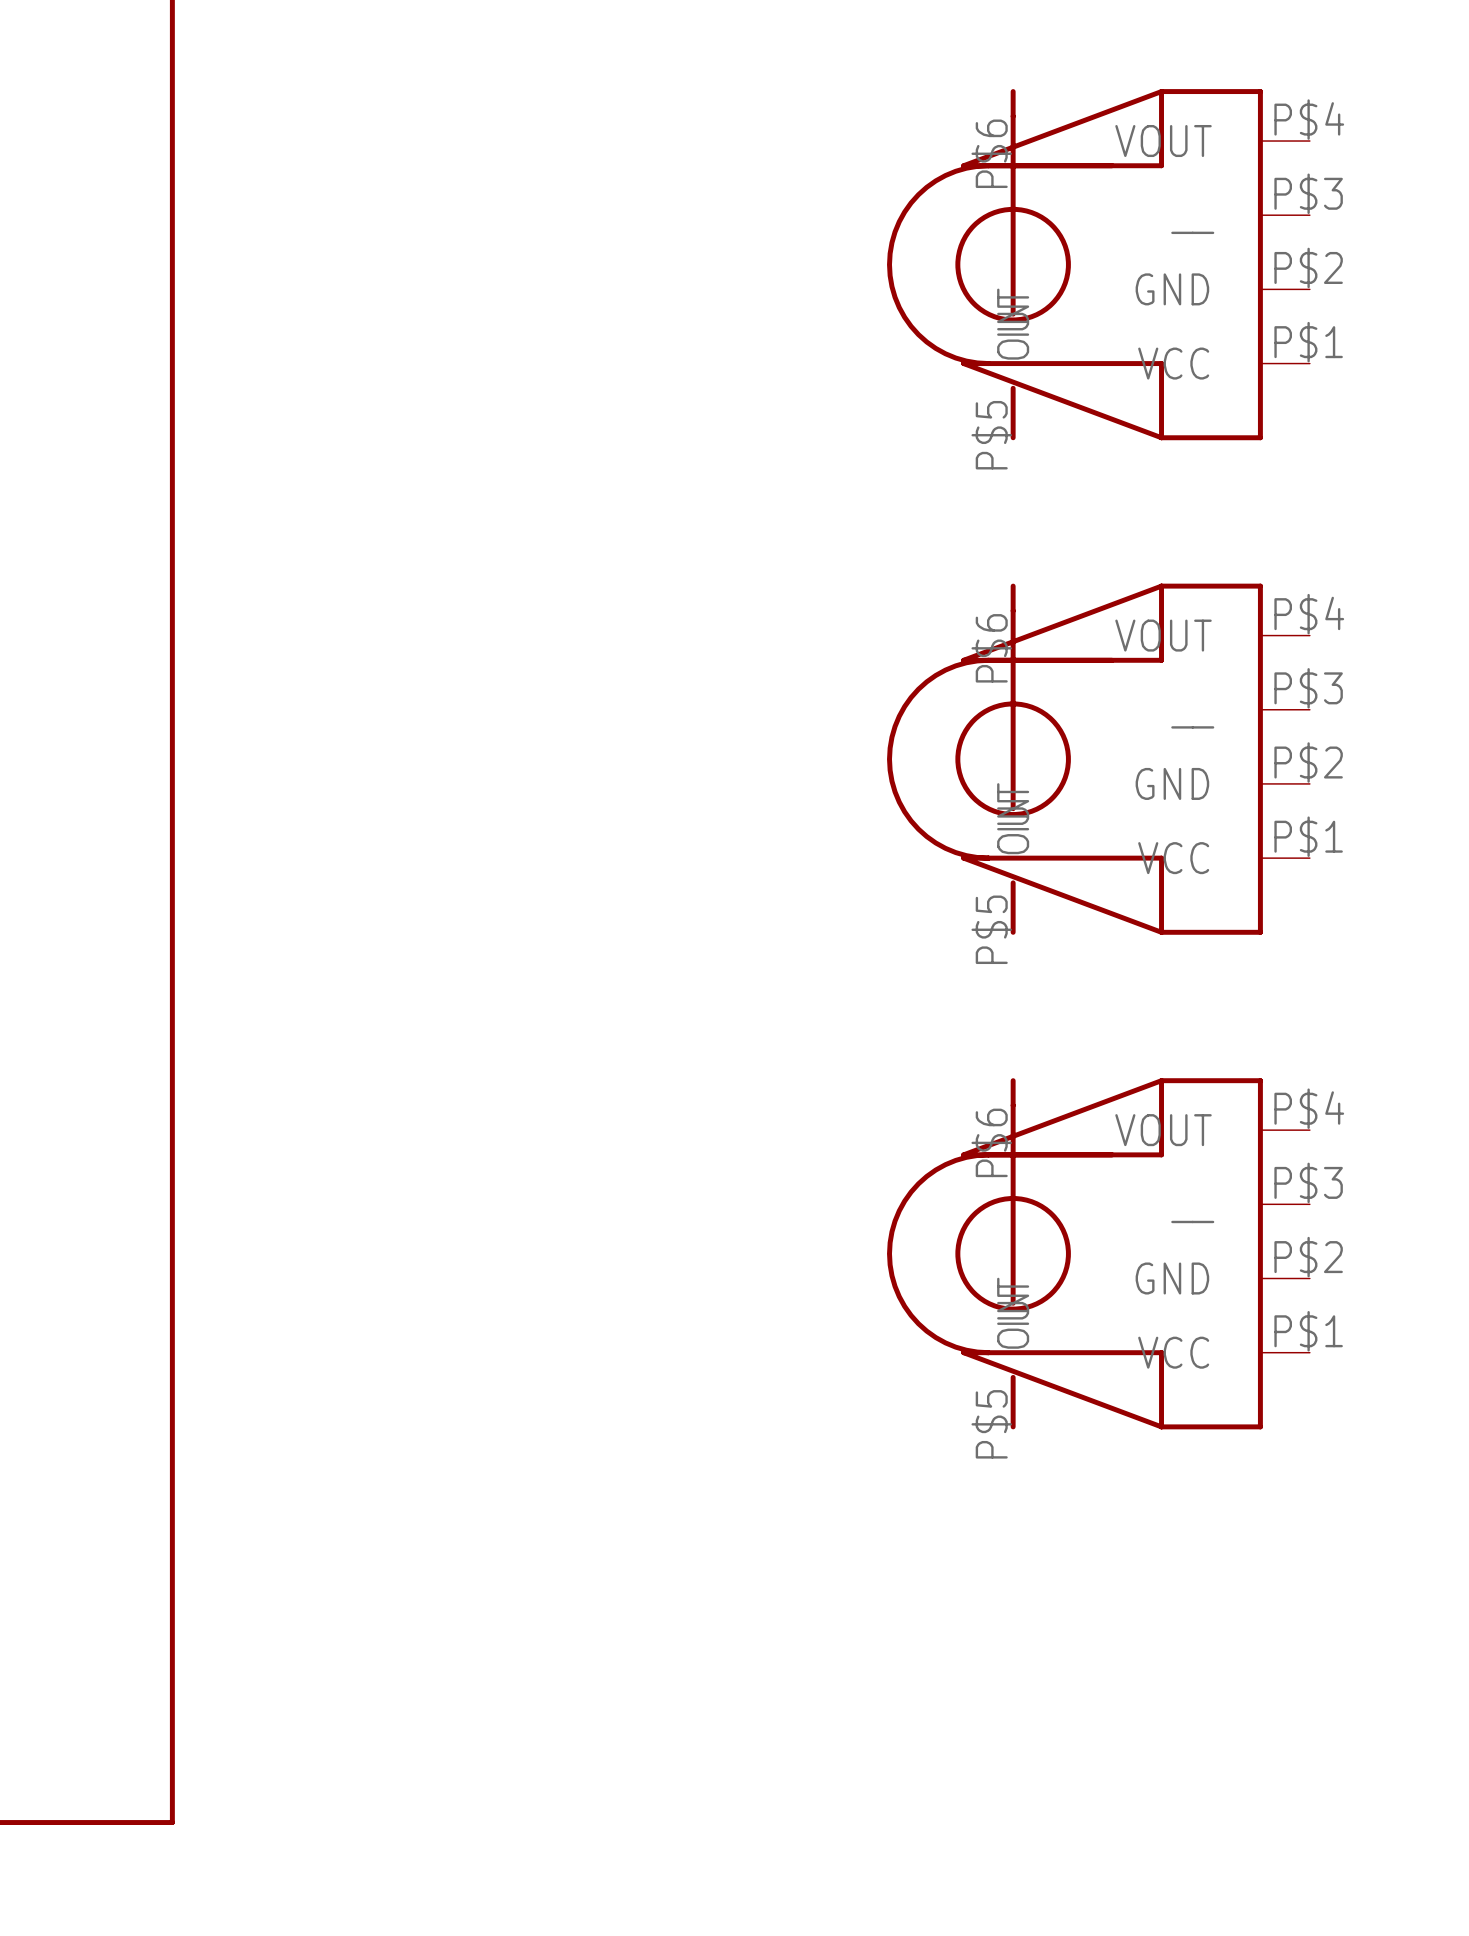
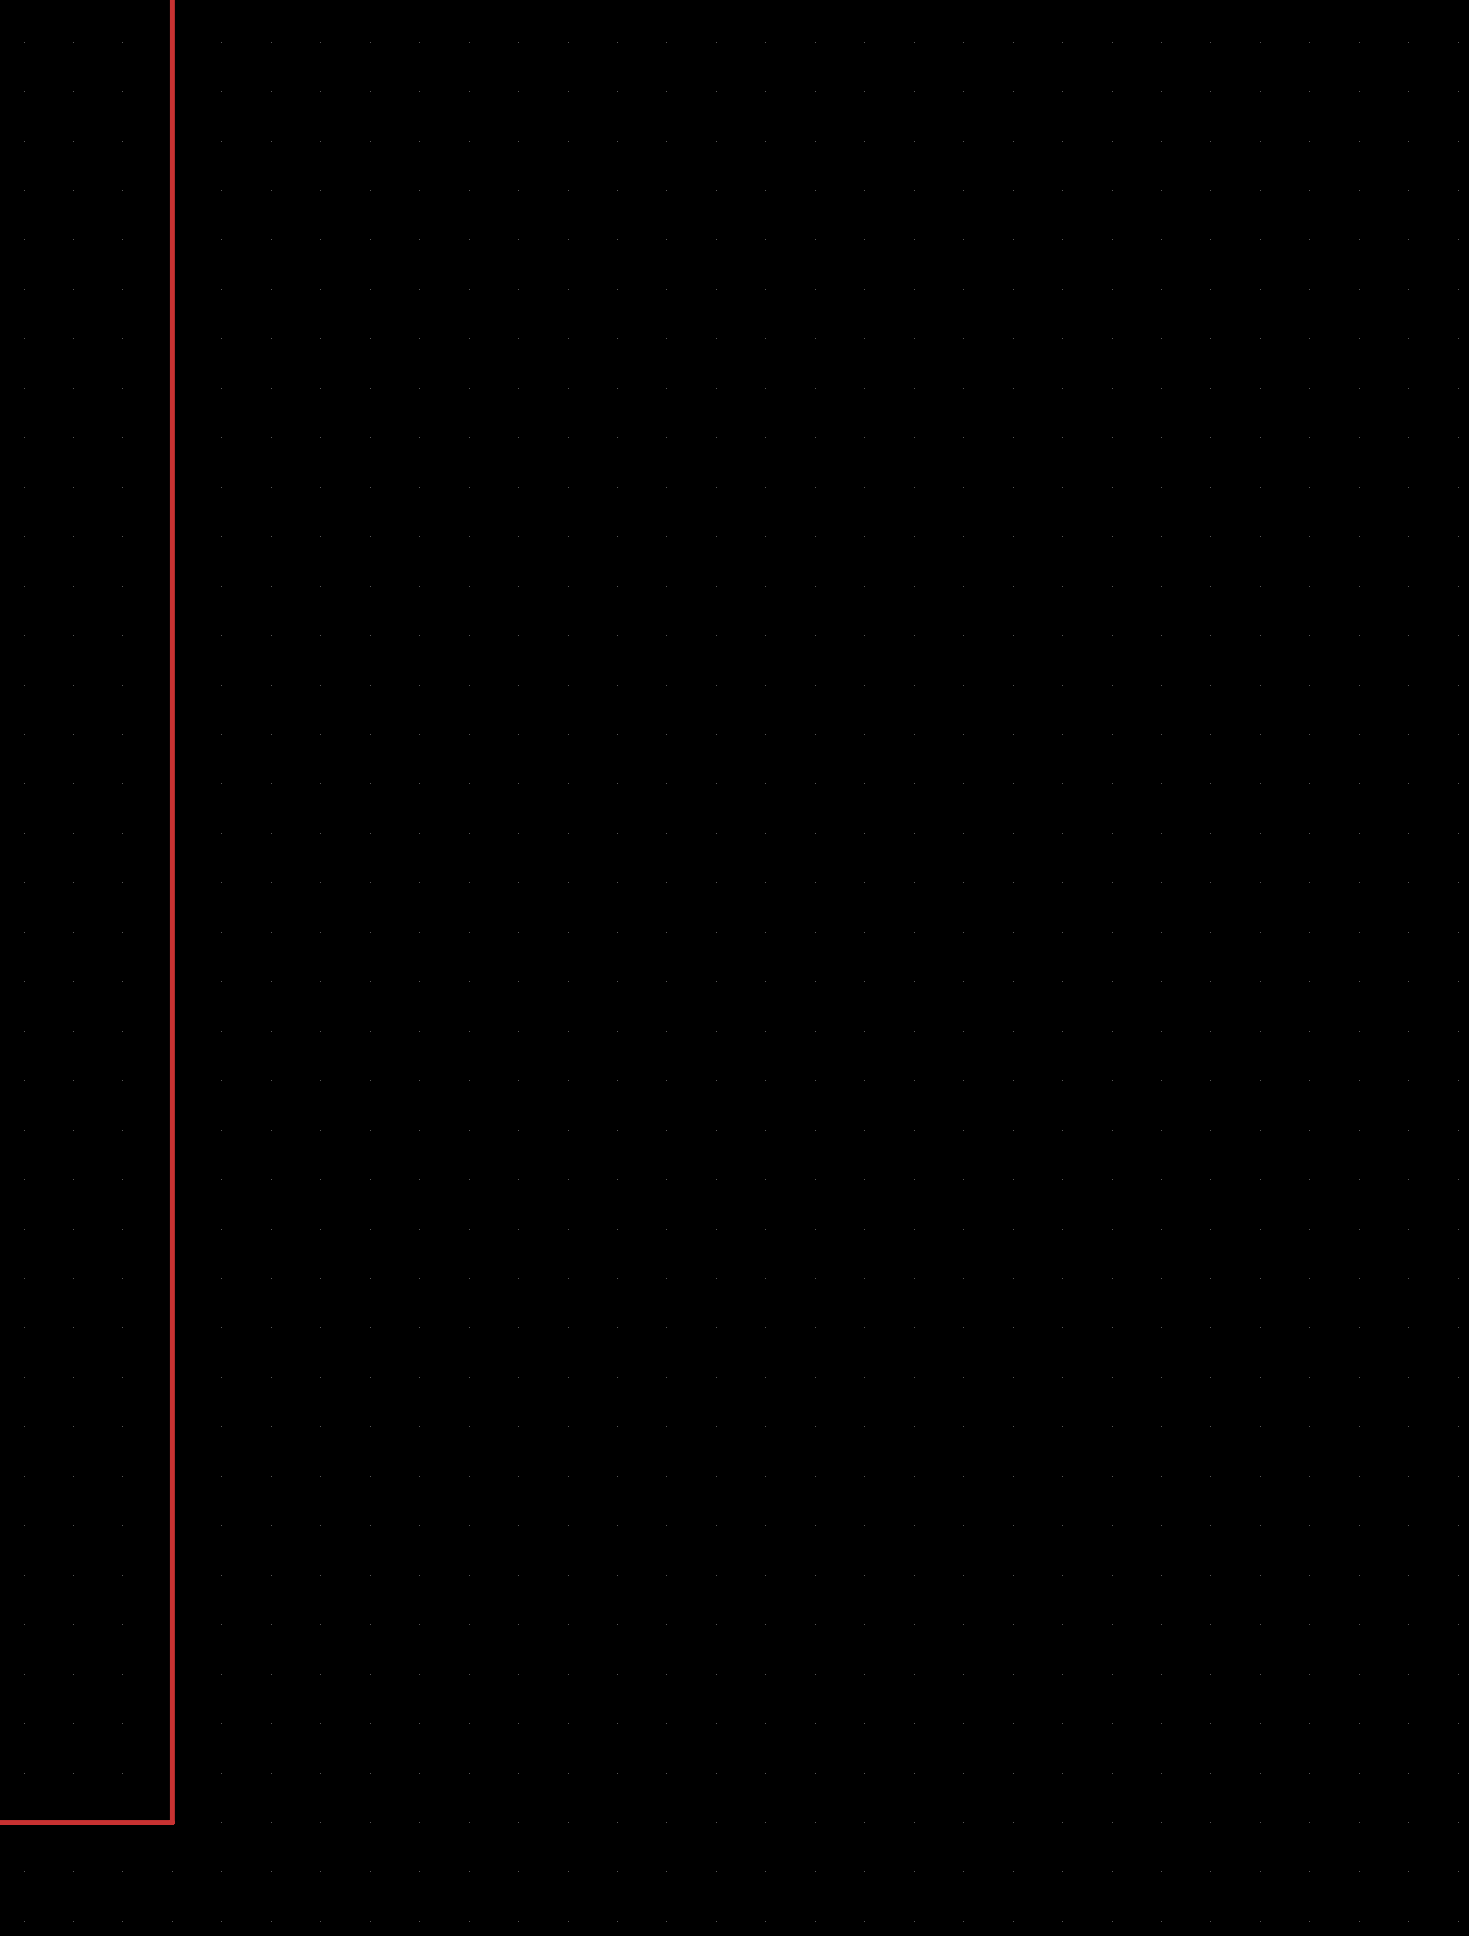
part: (1098, 264) -> none
part: (1098, 759) -> none
part: (1098, 1253) -> none

